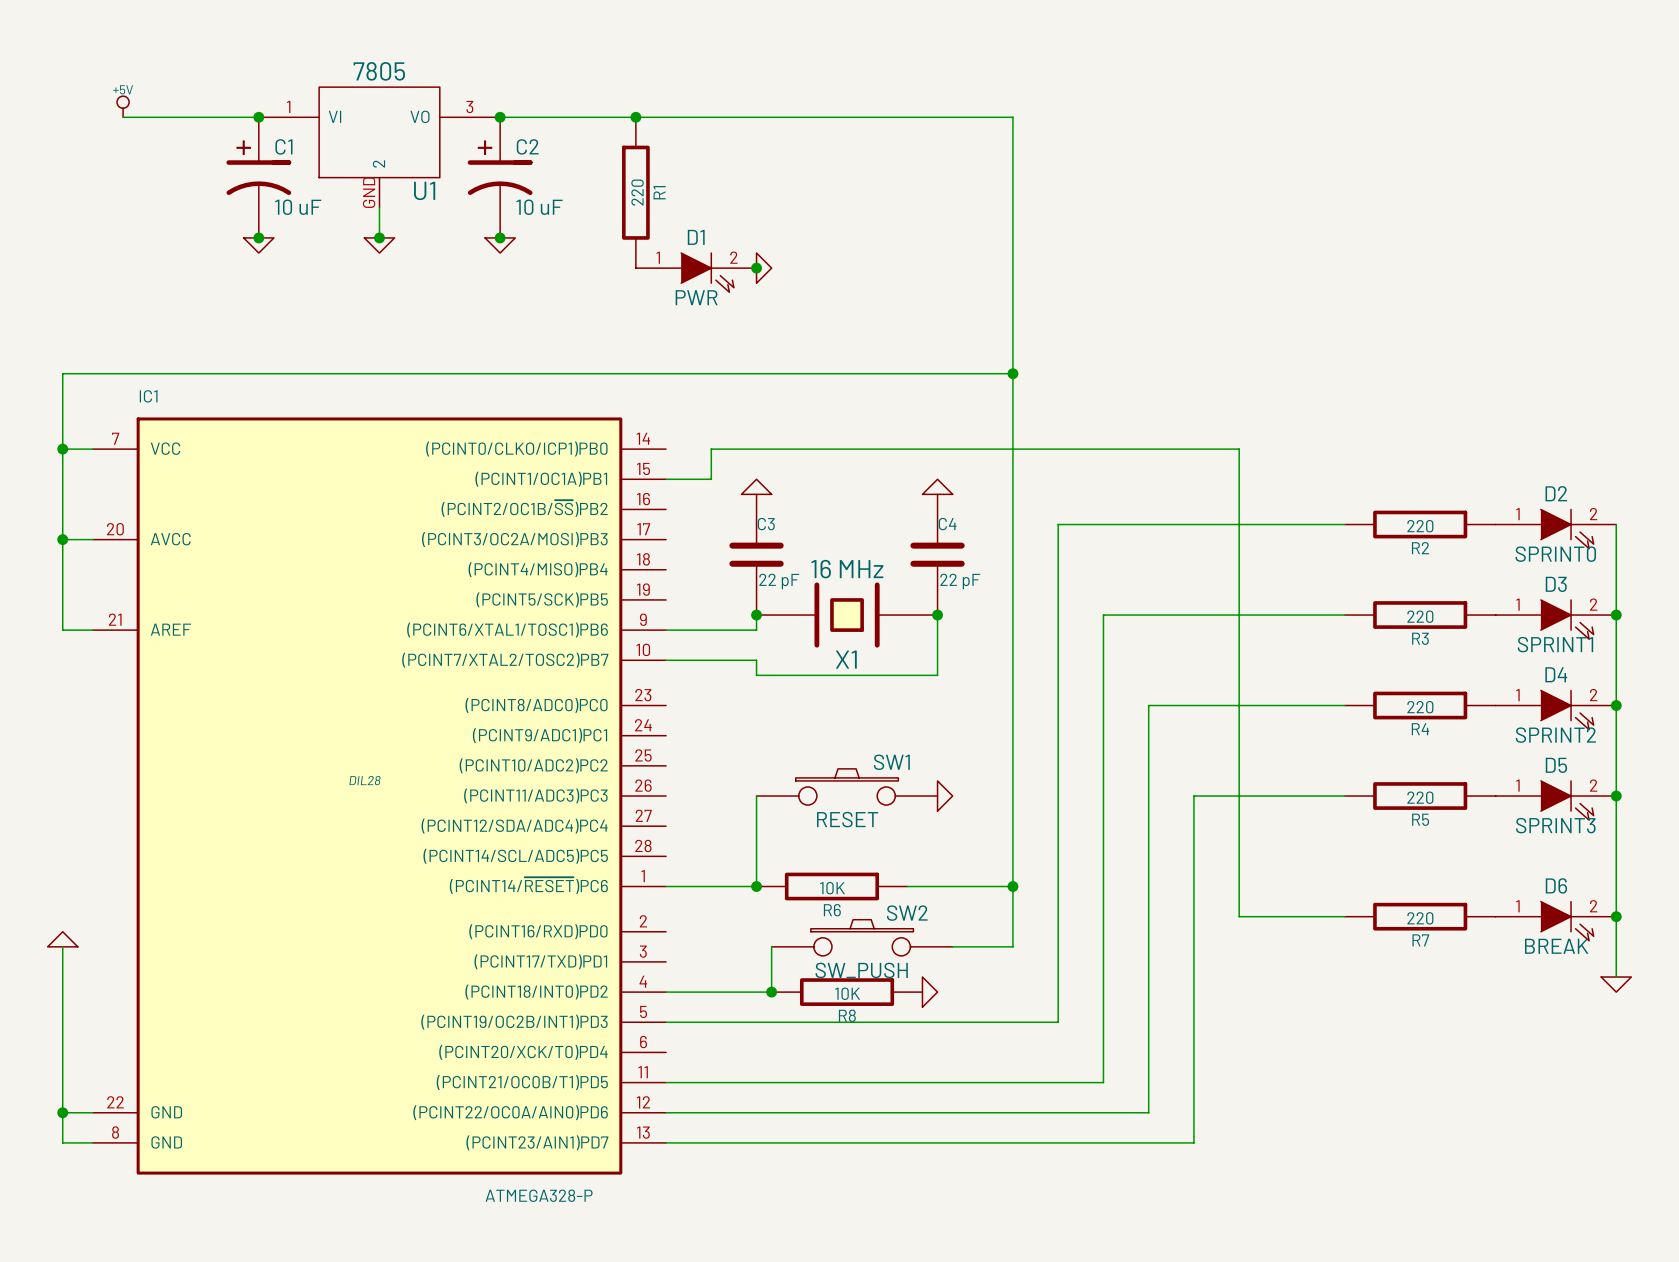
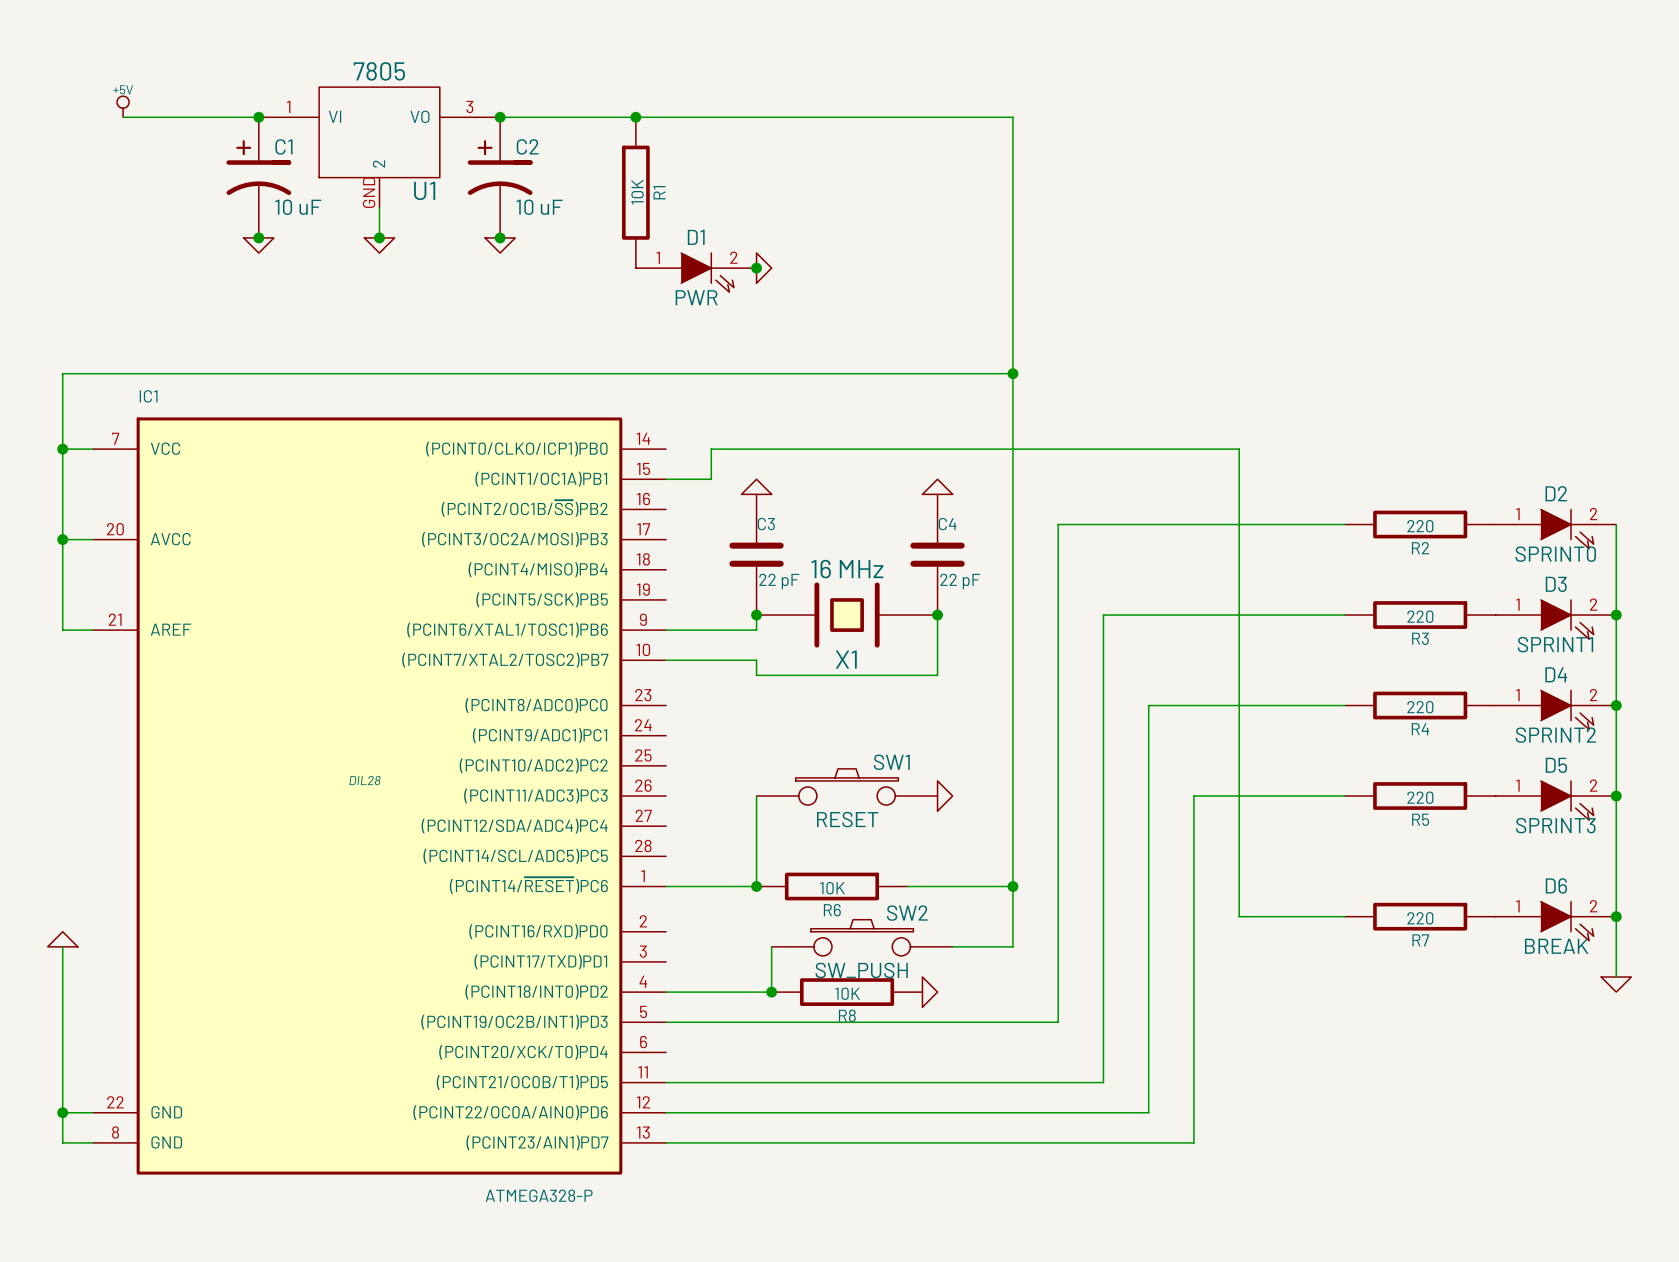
R1 value: 220 (637, 192) -> 10K (637, 192)

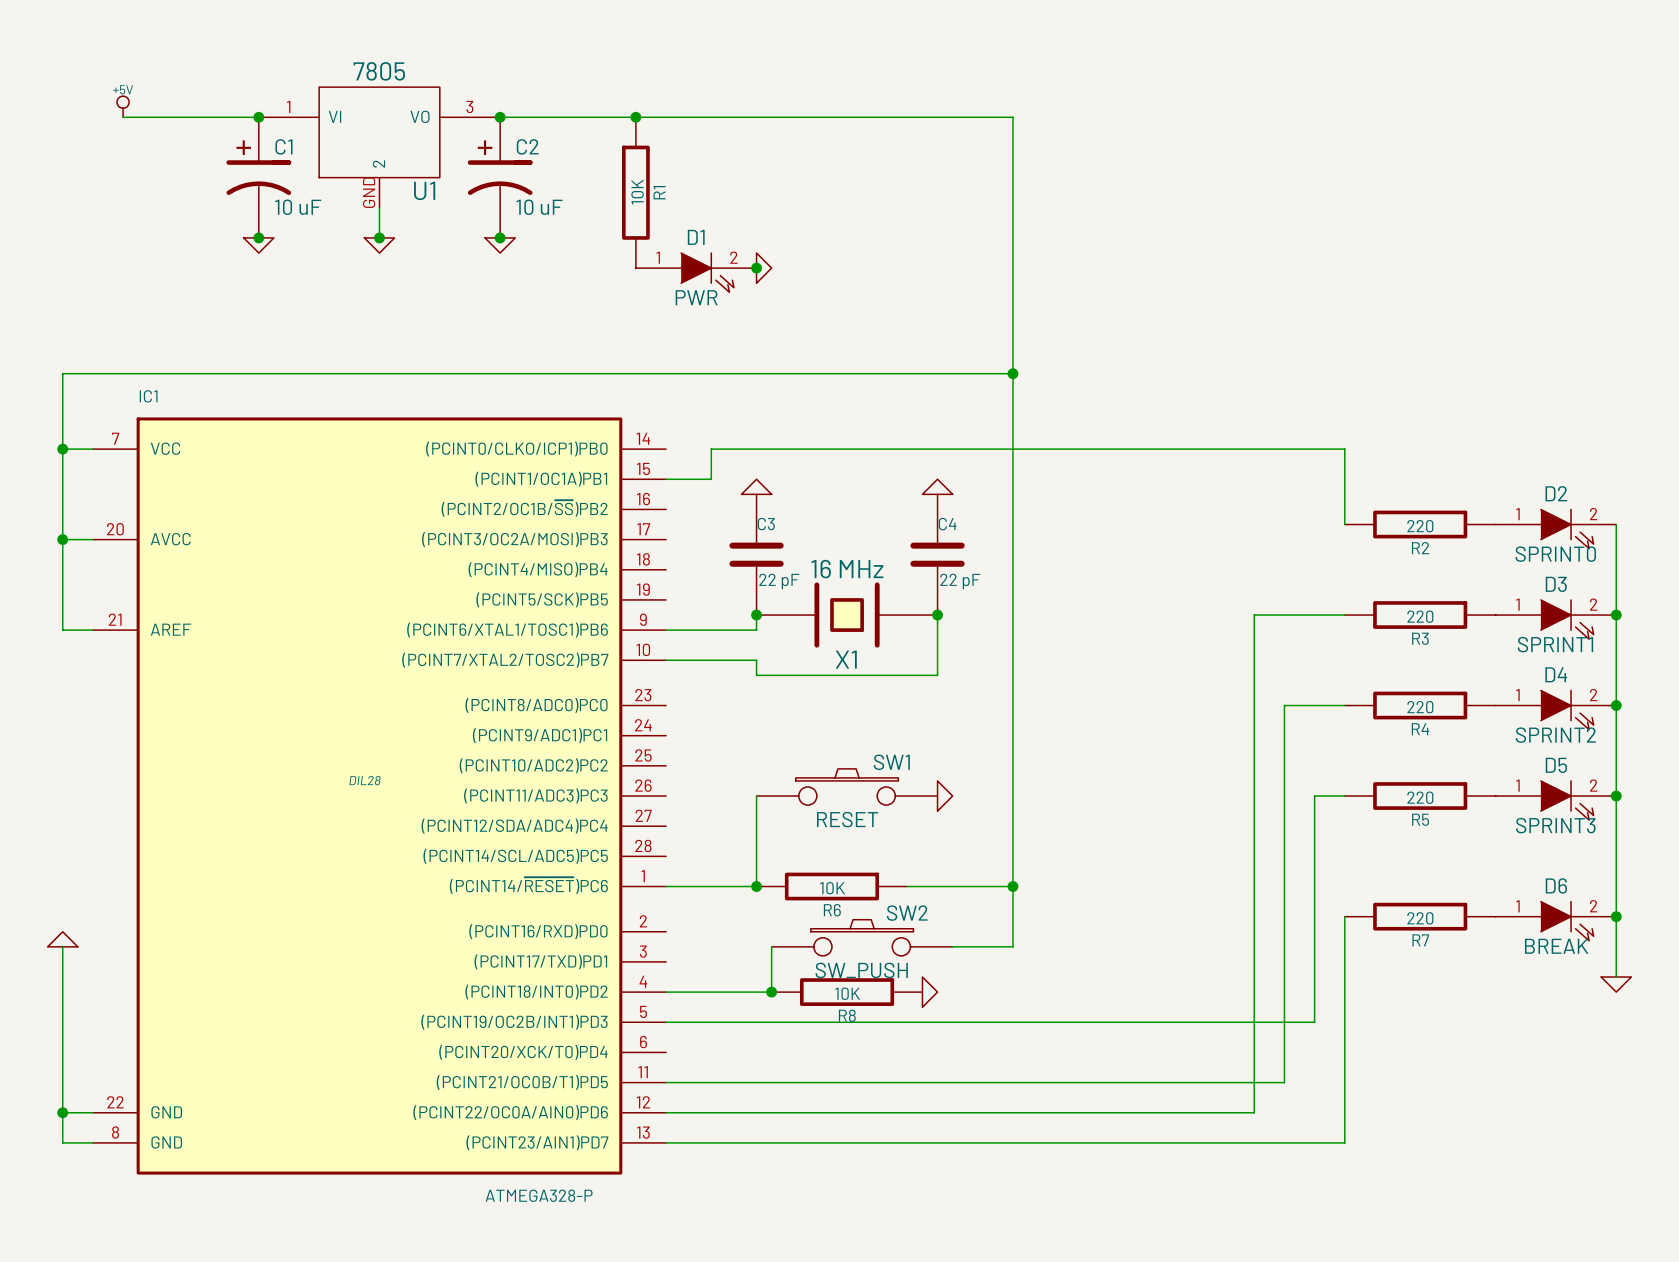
wire: (1239, 449) (1239, 916) (1344, 916) -> (1239, 449) (1344, 449) (1344, 524)
wire: (1344, 524) (1058, 524) (1058, 1022) -> (1314, 796) (1314, 1022) (1058, 1022)
wire: (1254, 615) (1103, 615) (1103, 1082) -> (1254, 615) (1254, 1112) (1148, 1112)
wire: (1284, 705) (1148, 705) (1148, 1112) -> (1284, 705) (1284, 1082) (1103, 1082)
wire: (1314, 796) (1193, 796) (1193, 1142) -> (1344, 916) (1344, 1142) (1193, 1142)

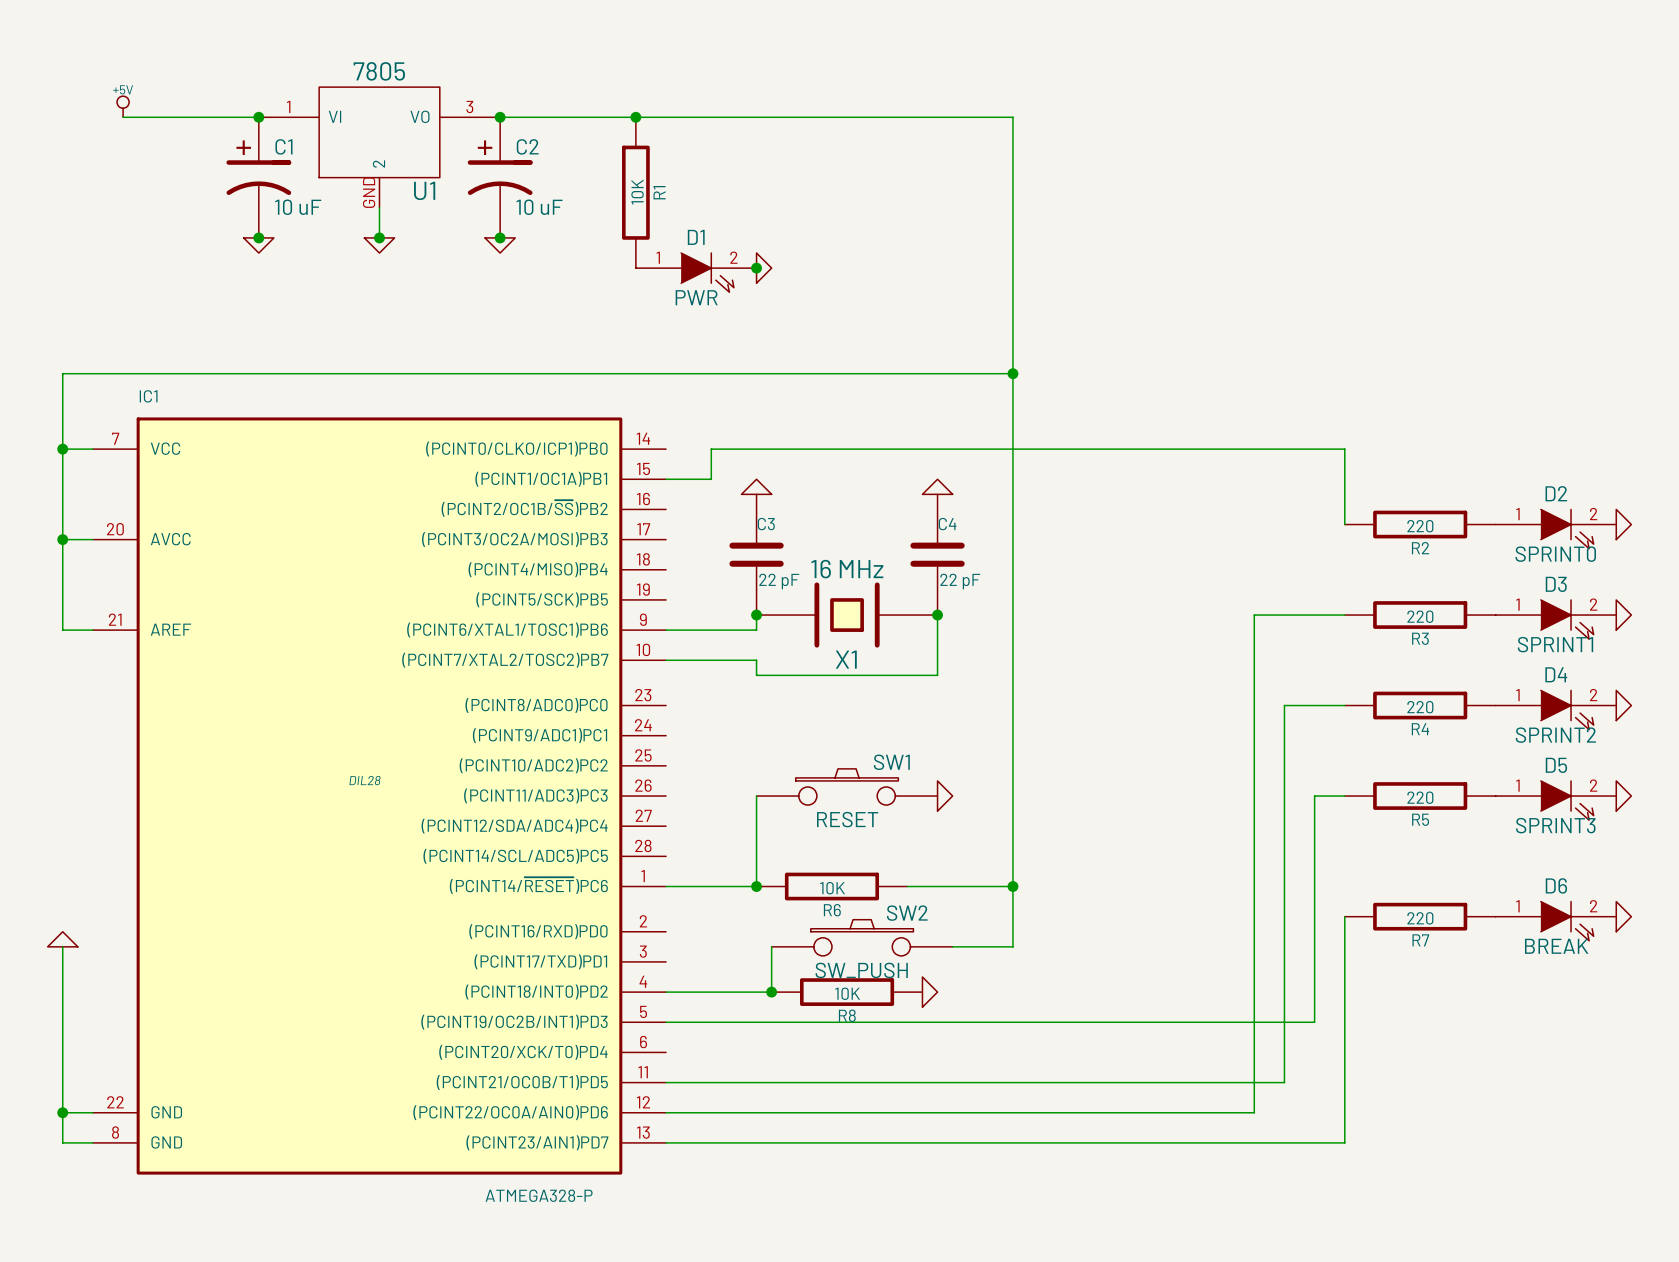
wire: (1616, 524) (1616, 977) -> none
power symbol: none -> (1623, 524)
junction: (1616, 615) -> none
power symbol: none -> (1623, 615)
junction: (1616, 705) -> none
power symbol: none -> (1623, 705)
junction: (1616, 796) -> none
power symbol: none -> (1623, 796)
junction: (1616, 916) -> none
power symbol rotation: 0° (1616, 984) -> 90° counterclockwise (1623, 916)
power symbol position: (1616, 984) -> (1623, 916)

